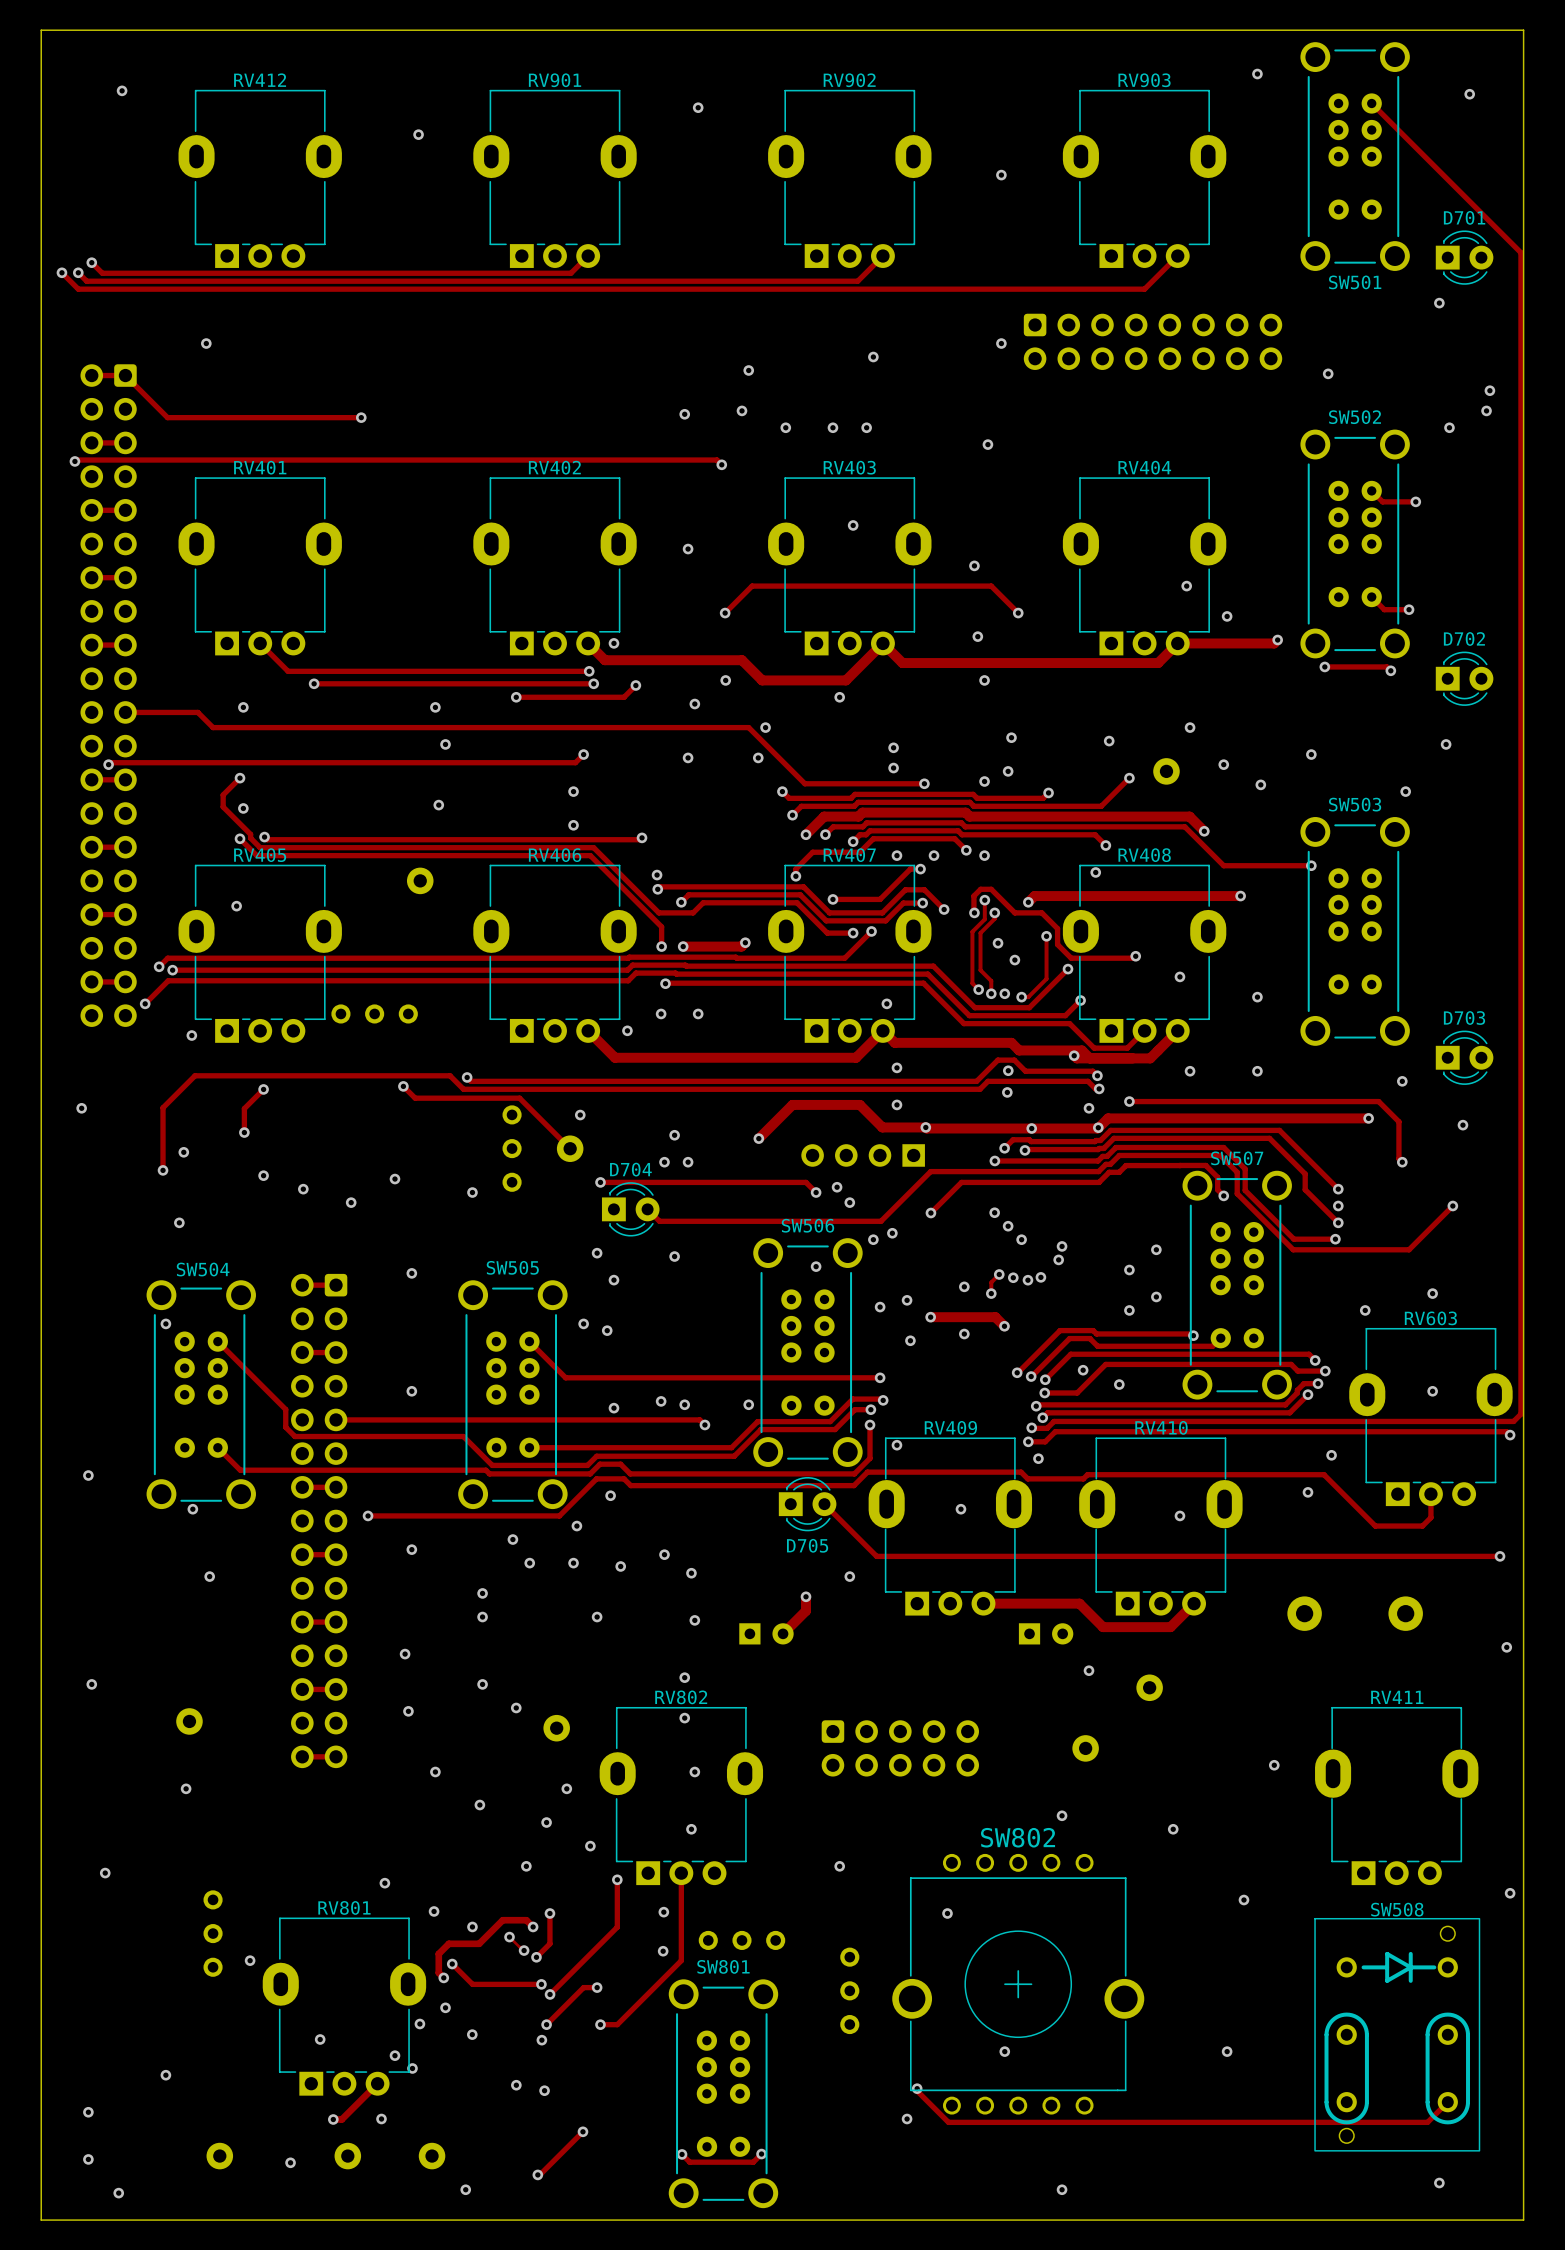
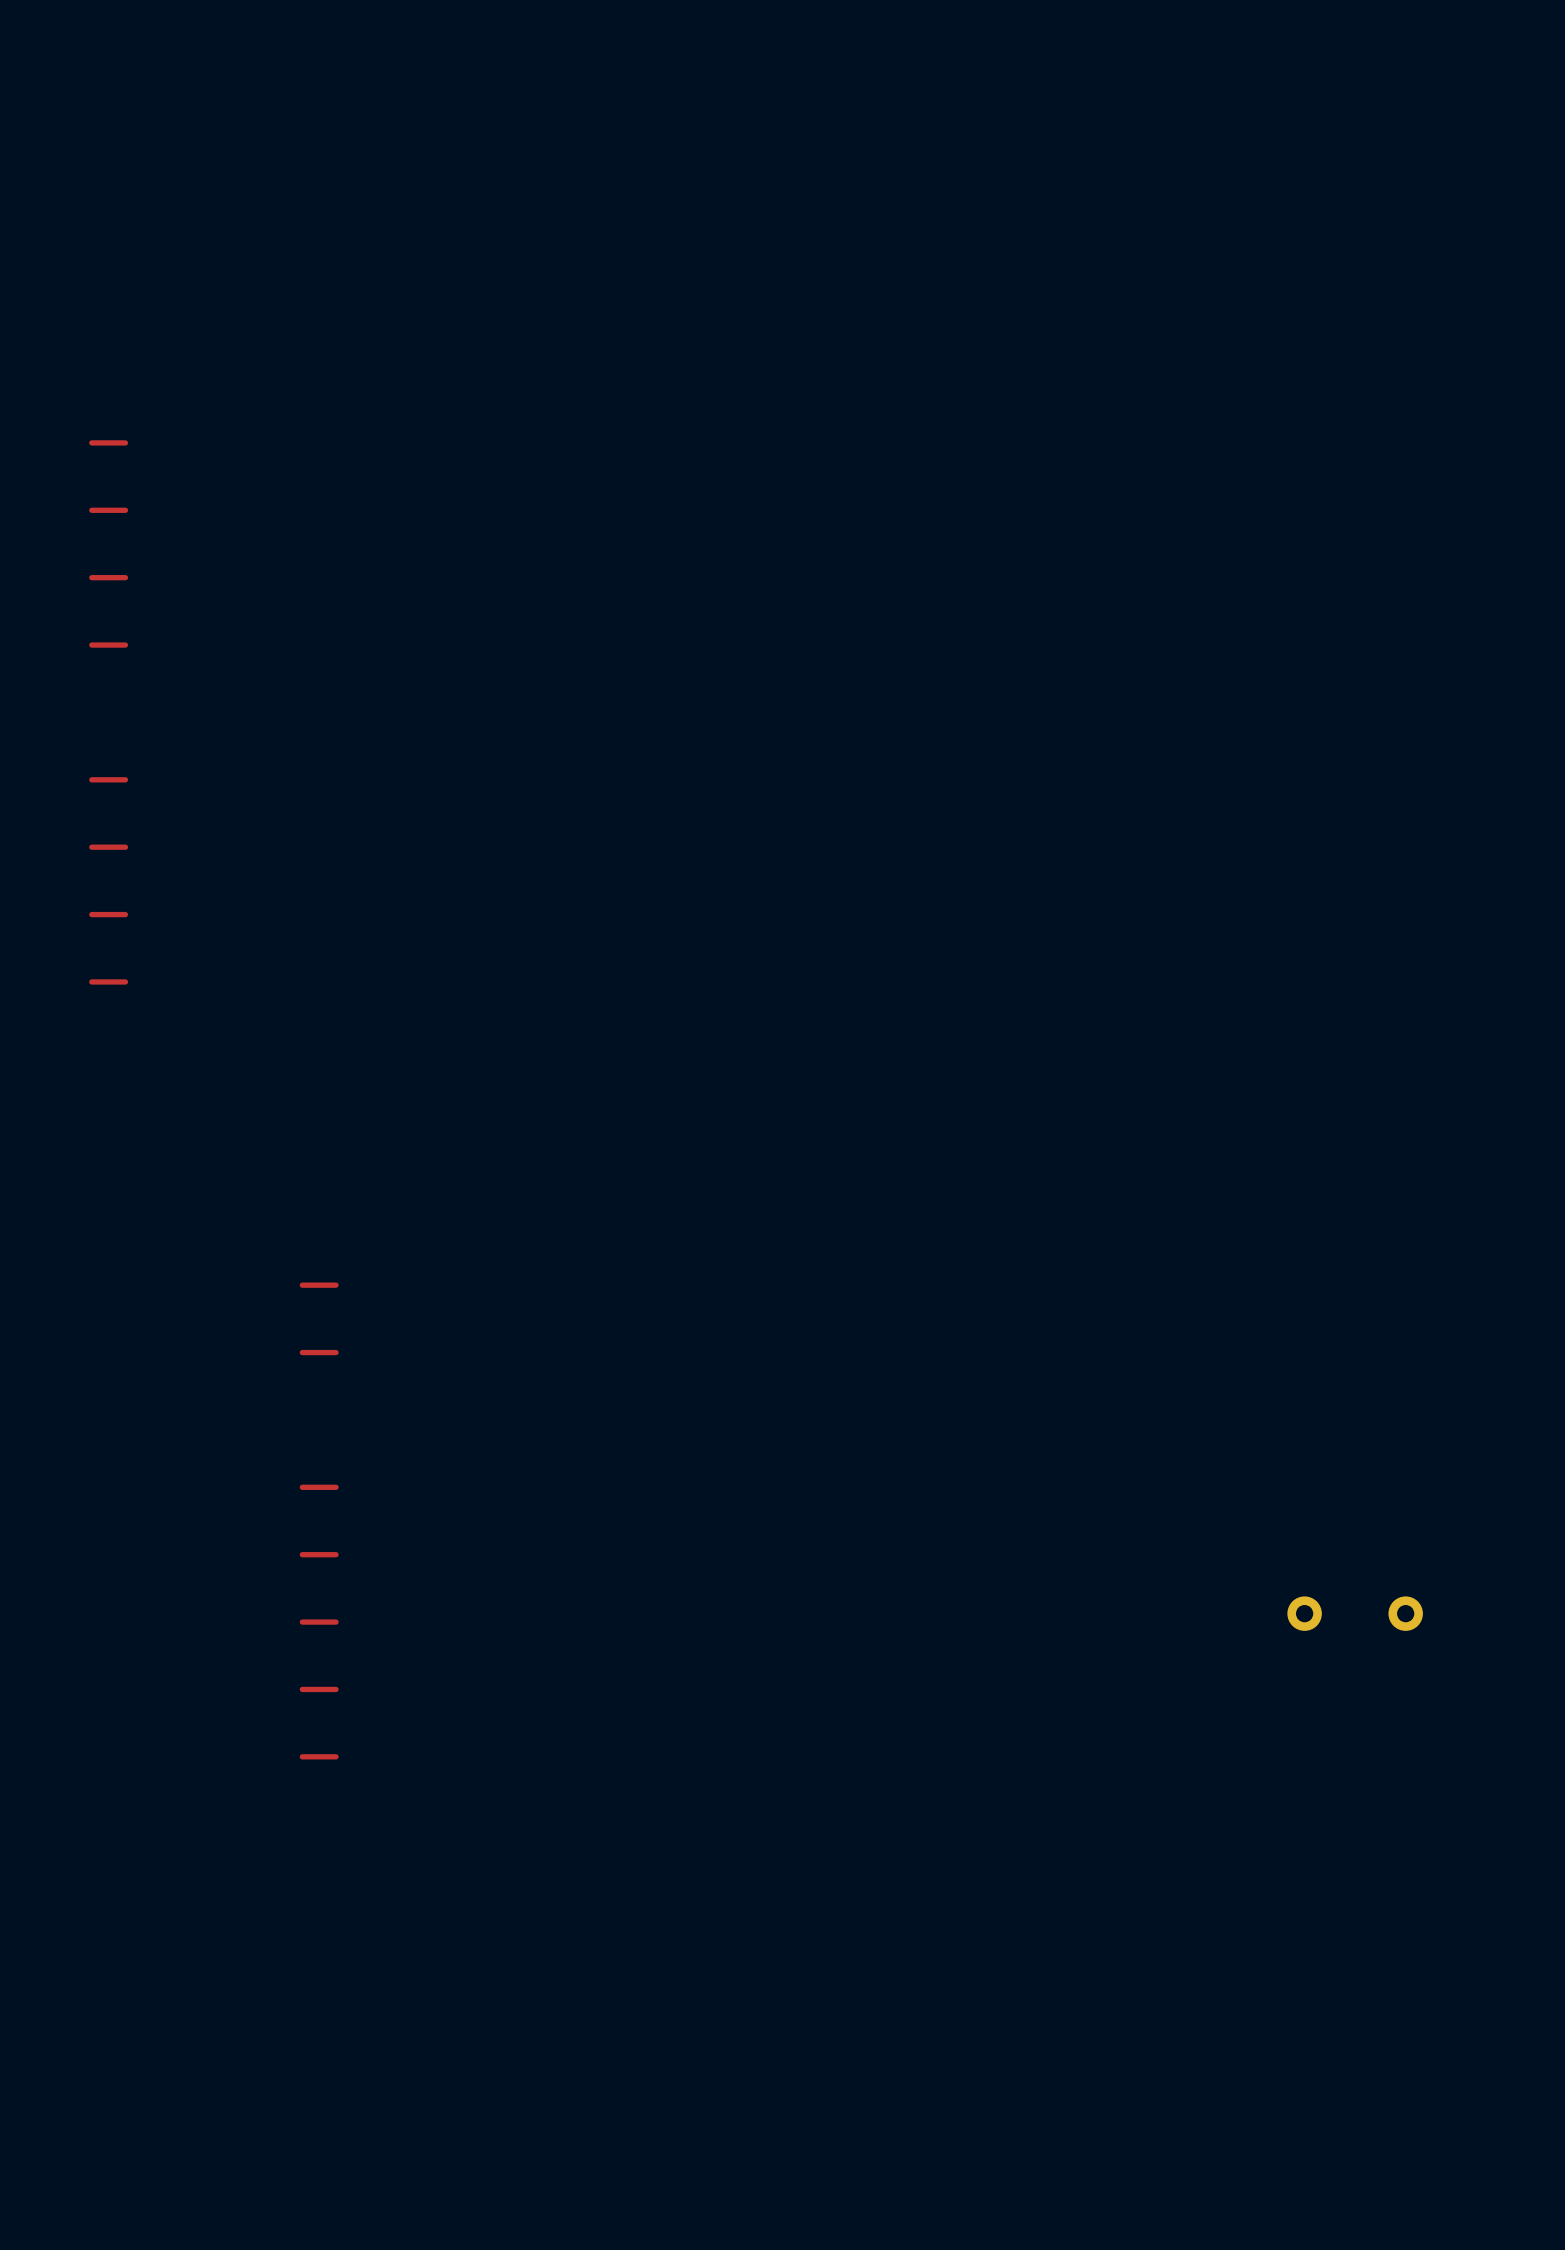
board edge: (41, 30) (1523, 30) (1523, 2220) (41, 2220) (41, 30) -> none
via: (1257, 74) -> none
via: (122, 90) -> none
via: (1469, 94) -> none
track: (1371, 103) (1520, 252) (1520, 1414) (1513, 1421) (1054, 1421) (1047, 1428) (1031, 1427) -> none
via: (698, 107) -> none
via: (418, 134) -> none
SW501: (1355, 156) -> none
via: (1001, 175) -> none
RV412: (260, 178) -> none
RV901: (555, 178) -> none
RV902: (849, 178) -> none
RV903: (1144, 178) -> none
track: (588, 256) (570, 273) (102, 273) (91, 262) -> none
track: (882, 256) (857, 281) (86, 281) (78, 272) -> none
track: (1177, 256) (1144, 289) (78, 289) (61, 272) -> none
D701: (1464, 257) -> none
via: (91, 262) -> none
via: (61, 272) -> none
via: (78, 272) -> none
via: (1439, 303) -> none
part: (1153, 341) -> none
via: (206, 343) -> none
via: (1001, 343) -> none
via: (873, 357) -> none
via: (748, 370) -> none
via: (1328, 373) -> none
track: (91, 375) (125, 375) (167, 417) (361, 417) -> none
via: (1489, 390) -> none
via: (741, 410) -> none
via: (1486, 410) -> none
via: (684, 414) -> none
via: (361, 417) -> none
via: (785, 427) -> none
via: (832, 427) -> none
via: (866, 427) -> none
via: (1449, 427) -> none
via: (987, 444) -> none
track: (74, 461) (716, 460) (721, 464) -> none
via: (74, 461) -> none
via: (721, 464) -> none
track: (1371, 490) (1382, 501) (1415, 501) -> none
via: (1415, 501) -> none
via: (853, 525) -> none
SW502: (1355, 543) -> none
via: (688, 549) -> none
via: (974, 565) -> none
RV401: (260, 566) -> none
RV402: (555, 566) -> none
RV403: (849, 566) -> none
RV404: (1144, 566) -> none
via: (1186, 586) -> none
track: (1371, 597) (1384, 609) (1409, 609) -> none
via: (1409, 609) -> none
track: (725, 613) (752, 586) (991, 586) (1018, 613) -> none
via: (725, 613) -> none
via: (1018, 613) -> none
via: (1227, 616) -> none
via: (977, 636) -> none
track: (1277, 640) (1274, 643) (1177, 643) (1158, 663) (902, 663) (882, 643) (845, 680) (762, 680) (741, 660) (604, 660) (588, 643) -> none
via: (1277, 640) -> none
track: (260, 643) (288, 671) (589, 671) -> none
via: (613, 643) -> none
track: (1324, 666) (1386, 666) (1390, 670) -> none
via: (1324, 666) -> none
via: (1390, 670) -> none
via: (589, 671) -> none
D702: (1464, 678) -> none
via: (725, 680) -> none
via: (984, 680) -> none
track: (314, 683) (593, 683) -> none
via: (314, 683) -> none
via: (593, 683) -> none
track: (635, 685) (624, 697) (516, 697) -> none
via: (635, 685) -> none
part: (108, 695) -> none
via: (516, 697) -> none
via: (839, 697) -> none
via: (694, 704) -> none
via: (243, 707) -> none
via: (435, 707) -> none
track: (125, 712) (197, 712) (213, 727) (748, 727) (804, 783) (924, 783) -> none
via: (765, 727) -> none
via: (1190, 727) -> none
via: (1011, 737) -> none
via: (1109, 741) -> none
via: (445, 744) -> none
via: (1446, 744) -> none
via: (893, 747) -> none
track: (583, 754) (575, 762) (110, 762) (108, 764) -> none
via: (583, 754) -> none
via: (1311, 754) -> none
via: (688, 757) -> none
via: (758, 757) -> none
via: (108, 764) -> none
via: (1223, 764) -> none
via: (893, 768) -> none
via: (1008, 771) -> none
part: (1166, 771) -> none
track: (240, 778) (223, 794) (223, 806) (250, 834) (250, 838) (260, 847) (593, 847) (658, 912) (693, 912) (703, 902) (796, 902) (827, 933) (853, 933) -> none
via: (240, 778) -> none
track: (1129, 778) (1101, 806) (973, 806) (969, 802) (858, 802) (854, 806) (801, 806) (792, 815) -> none
via: (1129, 778) -> none
via: (984, 781) -> none
via: (924, 783) -> none
via: (1260, 784) -> none
via: (573, 791) -> none
track: (782, 791) (789, 798) (851, 798) (854, 794) (973, 794) (977, 798) (1043, 798) (1048, 792) -> none
via: (782, 791) -> none
via: (1405, 791) -> none
via: (1048, 792) -> none
via: (438, 805) -> none
via: (243, 808) -> none
via: (792, 815) -> none
via: (573, 825) -> none
track: (1204, 831) (1189, 816) (969, 816) (965, 812) (862, 812) (858, 816) (824, 816) (806, 834) -> none
via: (1204, 831) -> none
via: (806, 834) -> none
track: (825, 834) (833, 826) (862, 826) (866, 822) (961, 822) (965, 826) (1184, 826) (1223, 865) (1311, 865) -> none
via: (825, 834) -> none
track: (264, 837) (267, 839) (640, 839) (642, 837) -> none
via: (264, 837) -> none
via: (642, 837) -> none
track: (240, 838) (256, 855) (590, 855) (661, 926) (661, 946) -> none
via: (240, 838) -> none
track: (853, 841) (860, 834) (866, 834) (870, 830) (958, 830) (962, 834) (1095, 834) (1105, 845) -> none
via: (853, 841) -> none
via: (1105, 845) -> none
track: (966, 850) (954, 838) (873, 838) (859, 852) (812, 852) (795, 869) (795, 876) -> none
via: (966, 850) -> none
via: (896, 855) -> none
via: (934, 855) -> none
via: (984, 855) -> none
via: (1311, 865) -> none
track: (920, 869) (910, 869) (880, 899) (832, 899) -> none
via: (920, 869) -> none
via: (1095, 872) -> none
via: (657, 875) -> none
via: (795, 876) -> none
part: (420, 880) -> none
track: (657, 889) (660, 886) (803, 886) (829, 912) (882, 912) (905, 889) (924, 889) (944, 909) -> none
via: (657, 889) -> none
track: (1240, 896) (1034, 896) (1028, 902) -> none
via: (1240, 896) -> none
via: (832, 899) -> none
track: (984, 900) (984, 919) (972, 931) (972, 983) (978, 989) -> none
via: (984, 900) -> none
track: (681, 902) (688, 894) (800, 894) (826, 920) (885, 920) (903, 903) (922, 903) -> none
via: (681, 902) -> none
via: (1028, 902) -> none
via: (922, 903) -> none
via: (236, 906) -> none
via: (944, 909) -> none
track: (974, 912) (973, 896) (980, 889) (991, 889) (1014, 912) (1041, 912) (1057, 928) (1057, 944) (1071, 958) (1133, 958) (1135, 956) -> none
via: (974, 912) -> none
track: (994, 912) (994, 918) (980, 933) (980, 970) (991, 980) (991, 993) -> none
via: (994, 912) -> none
track: (871, 931) (844, 958) (167, 958) (159, 966) -> none
via: (871, 931) -> none
SW503: (1355, 931) -> none
via: (853, 933) -> none
track: (1046, 936) (1046, 978) (1028, 997) (1021, 997) -> none
via: (1046, 936) -> none
track: (745, 942) (741, 946) (683, 946) -> none
via: (745, 942) -> none
via: (998, 943) -> none
via: (661, 946) -> none
via: (683, 946) -> none
RV405: (260, 953) -> none
RV406: (555, 953) -> none
RV407: (849, 953) -> none
RV408: (1144, 953) -> none
via: (1135, 956) -> none
via: (1014, 960) -> none
via: (159, 966) -> none
track: (1068, 969) (1029, 1007) (974, 1007) (933, 966) (632, 965) (627, 970) (172, 970) -> none
via: (1068, 969) -> none
via: (172, 970) -> none
via: (1179, 976) -> none
track: (665, 983) (923, 983) (963, 1023) (1069, 1023) (1094, 1048) (1127, 1048) (1144, 1030) -> none
via: (665, 983) -> none
via: (978, 989) -> none
via: (991, 993) -> none
via: (1004, 993) -> none
via: (1021, 997) -> none
via: (1257, 997) -> none
track: (1080, 1000) (1065, 1015) (969, 1015) (927, 974) (635, 973) (628, 980) (168, 980) (145, 1003) -> none
via: (1080, 1000) -> none
via: (145, 1003) -> none
via: (886, 1003) -> none
part: (374, 1013) -> none
via: (661, 1013) -> none
via: (698, 1013) -> none
track: (588, 1030) (615, 1057) (856, 1057) (882, 1030) (894, 1042) (1011, 1042) (1019, 1050) (1081, 1050) (1089, 1058) -> none
via: (627, 1030) -> none
track: (1177, 1030) (1150, 1058) (1076, 1058) (1074, 1055) -> none
via: (191, 1035) -> none
via: (1074, 1055) -> none
D703: (1464, 1057) -> none
via: (896, 1067) -> none
via: (1008, 1070) -> none
via: (1190, 1071) -> none
via: (1257, 1071) -> none
track: (1097, 1075) (1092, 1071) (1025, 1071) (1014, 1060) (997, 1060) (976, 1081) (471, 1081) (467, 1077) -> none
via: (1097, 1075) -> none
via: (467, 1077) -> none
via: (1402, 1081) -> none
track: (403, 1086) (415, 1098) (519, 1098) (570, 1148) -> none
via: (403, 1086) -> none
track: (1099, 1088) (1095, 1088) (1088, 1081) (987, 1081) (979, 1089) (463, 1089) (450, 1075) (195, 1075) (163, 1107) (163, 1170) -> none
via: (1099, 1088) -> none
track: (263, 1089) (244, 1108) (244, 1132) -> none
via: (263, 1089) -> none
via: (1007, 1092) -> none
track: (1129, 1101) (1378, 1101) (1398, 1121) (1398, 1158) (1402, 1162) -> none
via: (1129, 1101) -> none
via: (896, 1104) -> none
via: (81, 1108) -> none
via: (1088, 1108) -> none
via: (580, 1115) -> none
track: (1368, 1118) (1108, 1118) (1097, 1128) (926, 1128) (882, 1127) (859, 1104) (792, 1104) (758, 1138) -> none
via: (1368, 1118) -> none
via: (1462, 1125) -> none
via: (925, 1127) -> none
via: (1098, 1127) -> none
via: (1031, 1128) -> none
via: (244, 1132) -> none
via: (674, 1135) -> none
via: (758, 1138) -> none
part: (512, 1148) -> none
part: (570, 1148) -> none
track: (1004, 1148) (1013, 1139) (1094, 1141) (1100, 1140) (1110, 1130) (1279, 1130) (1338, 1189) -> none
via: (1004, 1148) -> none
track: (1024, 1150) (1098, 1149) (1103, 1148) (1113, 1138) (1269, 1138) (1305, 1174) (1305, 1189) (1338, 1222) -> none
via: (1024, 1150) -> none
via: (183, 1152) -> none
part: (863, 1155) -> none
track: (994, 1160) (1098, 1160) (1102, 1156) (1107, 1156) (1116, 1147) (1223, 1147) (1245, 1169) (1245, 1190) (1293, 1239) (1335, 1239) -> none
via: (994, 1160) -> none
via: (664, 1162) -> none
via: (688, 1162) -> none
via: (1402, 1162) -> none
track: (1179, 1165) (1126, 1165) (1119, 1172) (1109, 1172) (1099, 1182) (961, 1182) (930, 1213) -> none
track: (1180, 1165) (1205, 1165) (1217, 1177) (1217, 1189) (1223, 1195) -> none
via: (163, 1170) -> none
via: (263, 1175) -> none
via: (394, 1179) -> none
track: (600, 1182) (806, 1182) (816, 1192) -> none
via: (600, 1182) -> none
via: (837, 1187) -> none
via: (303, 1189) -> none
via: (1338, 1189) -> none
via: (472, 1192) -> none
via: (816, 1192) -> none
via: (1223, 1195) -> none
via: (351, 1202) -> none
via: (849, 1202) -> none
via: (1338, 1206) -> none
track: (1452, 1206) (1409, 1249) (1293, 1249) (1237, 1193) (1237, 1172) (1220, 1155) (1119, 1155) (1110, 1164) (1105, 1164) (1098, 1171) (930, 1171) (880, 1221) (659, 1221) (647, 1209) -> none
via: (1452, 1206) -> none
D704: (630, 1209) -> none
via: (994, 1212) -> none
via: (930, 1213) -> none
via: (179, 1222) -> none
via: (1338, 1222) -> none
via: (1008, 1226) -> none
via: (892, 1233) -> none
via: (873, 1239) -> none
via: (1021, 1239) -> none
via: (1335, 1239) -> none
via: (1062, 1246) -> none
via: (1156, 1249) -> none
via: (597, 1253) -> none
via: (674, 1256) -> none
via: (1058, 1259) -> none
via: (816, 1266) -> none
via: (1129, 1270) -> none
via: (411, 1273) -> none
track: (999, 1274) (991, 1282) (991, 1293) -> none
via: (999, 1274) -> none
via: (1013, 1277) -> none
via: (1040, 1277) -> none
via: (613, 1280) -> none
via: (1027, 1280) -> none
SW507: (1237, 1285) -> none
via: (964, 1286) -> none
via: (991, 1293) -> none
via: (1432, 1293) -> none
via: (1156, 1296) -> none
via: (907, 1300) -> none
via: (880, 1307) -> none
via: (1129, 1310) -> none
via: (1365, 1310) -> none
track: (930, 1317) (995, 1317) (1004, 1326) -> none
via: (930, 1317) -> none
via: (165, 1323) -> none
via: (583, 1323) -> none
via: (1004, 1326) -> none
via: (607, 1330) -> none
via: (964, 1334) -> none
track: (1193, 1335) (1191, 1333) (1096, 1333) (1093, 1330) (1060, 1330) (1017, 1372) -> none
via: (1193, 1335) -> none
track: (1220, 1338) (1212, 1346) (1097, 1346) (1089, 1338) (1069, 1338) (1031, 1376) -> none
via: (910, 1340) -> none
track: (217, 1341) (285, 1409) (285, 1427) (294, 1436) (463, 1436) (492, 1465) (587, 1465) (596, 1456) (734, 1456) (760, 1429) (835, 1429) (854, 1409) (870, 1409) -> none
track: (529, 1341) (565, 1377) (880, 1377) -> none
SW506: (807, 1352) -> none
track: (1315, 1360) (1308, 1354) (1070, 1354) (1045, 1379) -> none
via: (1315, 1360) -> none
via: (1083, 1370) -> none
track: (1325, 1371) (1297, 1371) (1291, 1364) (1105, 1364) (1077, 1392) (1044, 1392) -> none
via: (1325, 1371) -> none
via: (1017, 1372) -> none
via: (1031, 1376) -> none
via: (880, 1377) -> none
via: (1045, 1379) -> none
track: (1318, 1383) (1303, 1383) (1285, 1404) (1036, 1406) -> none
via: (1318, 1383) -> none
via: (1119, 1384) -> none
via: (411, 1391) -> none
via: (1432, 1391) -> none
via: (1044, 1392) -> none
SW504: (201, 1394) -> none
SW505: (512, 1394) -> none
track: (1307, 1394) (1289, 1412) (1047, 1412) (1042, 1417) -> none
via: (1307, 1394) -> none
track: (883, 1400) (852, 1399) (830, 1421) (757, 1421) (731, 1447) (529, 1447) -> none
via: (883, 1400) -> none
via: (661, 1401) -> none
via: (684, 1404) -> none
via: (748, 1404) -> none
via: (1036, 1406) -> none
via: (613, 1408) -> none
via: (870, 1409) -> none
via: (1042, 1417) -> none
RV603: (1430, 1417) -> none
track: (336, 1419) (699, 1419) (704, 1424) -> none
via: (704, 1424) -> none
track: (870, 1424) (870, 1458) (854, 1473) (630, 1473) (620, 1464) (599, 1464) (590, 1473) (489, 1473) (485, 1470) (240, 1470) (217, 1447) -> none
via: (870, 1424) -> none
via: (1031, 1427) -> none
track: (1510, 1435) (1506, 1431) (1055, 1431) (1045, 1441) (1028, 1441) -> none
via: (1510, 1435) -> none
via: (1028, 1441) -> none
via: (896, 1445) -> none
via: (1331, 1455) -> none
via: (1038, 1458) -> none
via: (88, 1475) -> none
via: (1307, 1492) -> none
track: (1430, 1494) (1430, 1517) (1422, 1526) (1375, 1526) (1324, 1474) (1087, 1474) (1083, 1478) (1027, 1478) (1021, 1472) (867, 1472) (854, 1485) (630, 1485) (624, 1478) (596, 1478) (559, 1515) (368, 1515) -> none
via: (610, 1495) -> none
D705: (807, 1504) -> none
track: (824, 1504) (876, 1556) (1500, 1556) -> none
via: (192, 1509) -> none
via: (960, 1509) -> none
via: (368, 1515) -> none
via: (1179, 1515) -> none
part: (319, 1521) -> none
via: (576, 1526) -> none
RV409: (950, 1526) -> none
RV410: (1160, 1526) -> none
via: (512, 1539) -> none
via: (411, 1549) -> none
via: (664, 1554) -> none
via: (1500, 1556) -> none
via: (529, 1563) -> none
via: (573, 1563) -> none
via: (620, 1566) -> none
via: (691, 1573) -> none
via: (209, 1576) -> none
via: (849, 1576) -> none
via: (482, 1593) -> none
track: (806, 1596) (806, 1610) (783, 1633) -> none
via: (806, 1596) -> none
track: (983, 1603) (1079, 1603) (1103, 1627) (1170, 1627) (1194, 1603) -> none
via: (482, 1617) -> none
via: (597, 1617) -> none
via: (694, 1620) -> none
part: (766, 1633) -> none
part: (1046, 1633) -> none
via: (1506, 1647) -> none
via: (405, 1654) -> none
via: (1088, 1670) -> none
via: (684, 1677) -> none
via: (91, 1684) -> none
via: (482, 1684) -> none
part: (1149, 1687) -> none
via: (516, 1707) -> none
via: (408, 1711) -> none
via: (684, 1718) -> none
part: (189, 1721) -> none
part: (556, 1728) -> none
part: (900, 1748) -> none
part: (1085, 1748) -> none
via: (1274, 1765) -> none
via: (435, 1771) -> none
via: (694, 1771) -> none
via: (186, 1788) -> none
via: (566, 1788) -> none
RV802: (681, 1796) -> none
RV411: (1396, 1796) -> none
via: (479, 1805) -> none
via: (1062, 1815) -> none
via: (546, 1822) -> none
via: (691, 1829) -> none
via: (1173, 1829) -> none
via: (590, 1846) -> none
via: (526, 1866) -> none
via: (839, 1866) -> none
via: (105, 1873) -> none
track: (681, 1873) (681, 1960) (617, 2024) (600, 2024) -> none
track: (617, 1879) (617, 1927) (550, 1994) -> none
via: (617, 1879) -> none
via: (384, 1883) -> none
via: (1510, 1893) -> none
via: (1243, 1900) -> none
via: (434, 1911) -> none
via: (663, 1912) -> none
track: (549, 1913) (549, 1943) (536, 1957) -> none
via: (549, 1913) -> none
via: (947, 1913) -> none
via: (472, 1926) -> none
track: (533, 1926) (526, 1920) (502, 1920) (479, 1943) (448, 1943) (438, 1953) (438, 1972) (443, 1977) -> none
via: (533, 1926) -> none
part: (213, 1933) -> none
track: (509, 1937) (519, 1947) (523, 1947) (524, 1950) -> none
via: (509, 1937) -> none
part: (741, 1940) -> none
via: (524, 1950) -> none
via: (663, 1951) -> none
via: (536, 1957) -> none
via: (250, 1960) -> none
track: (452, 1964) (472, 1984) (541, 1984) -> none
via: (452, 1964) -> none
via: (443, 1977) -> none
via: (541, 1984) -> none
SW802: (1018, 1984) -> none
track: (597, 1987) (583, 1987) (546, 2024) -> none
via: (597, 1987) -> none
part: (849, 1990) -> none
via: (550, 1994) -> none
RV801: (344, 2006) -> none
via: (445, 2007) -> none
via: (419, 2023) -> none
via: (546, 2024) -> none
via: (600, 2024) -> none
via: (472, 2034) -> none
SW508: (1397, 2034) -> none
via: (320, 2039) -> none
via: (541, 2040) -> none
via: (1004, 2051) -> none
via: (1227, 2051) -> none
via: (394, 2055) -> none
via: (412, 2068) -> none
via: (165, 2075) -> none
track: (377, 2083) (341, 2119) (333, 2119) -> none
via: (516, 2085) -> none
track: (917, 2088) (917, 2091) (948, 2122) (1427, 2122) (1447, 2102) -> none
via: (917, 2088) -> none
via: (544, 2090) -> none
SW801: (723, 2093) -> none
via: (88, 2112) -> none
via: (333, 2119) -> none
via: (381, 2119) -> none
via: (907, 2119) -> none
track: (582, 2131) (537, 2174) -> none
via: (582, 2131) -> none
via: (682, 2154) -> none
track: (761, 2154) (753, 2162) (689, 2162) (682, 2154) -> none
via: (761, 2154) -> none
part: (219, 2156) -> none
part: (347, 2156) -> none
part: (432, 2156) -> none
via: (88, 2159) -> none
via: (290, 2162) -> none
via: (537, 2174) -> none
via: (1439, 2183) -> none
via: (465, 2189) -> none
via: (1062, 2189) -> none
via: (118, 2193) -> none

